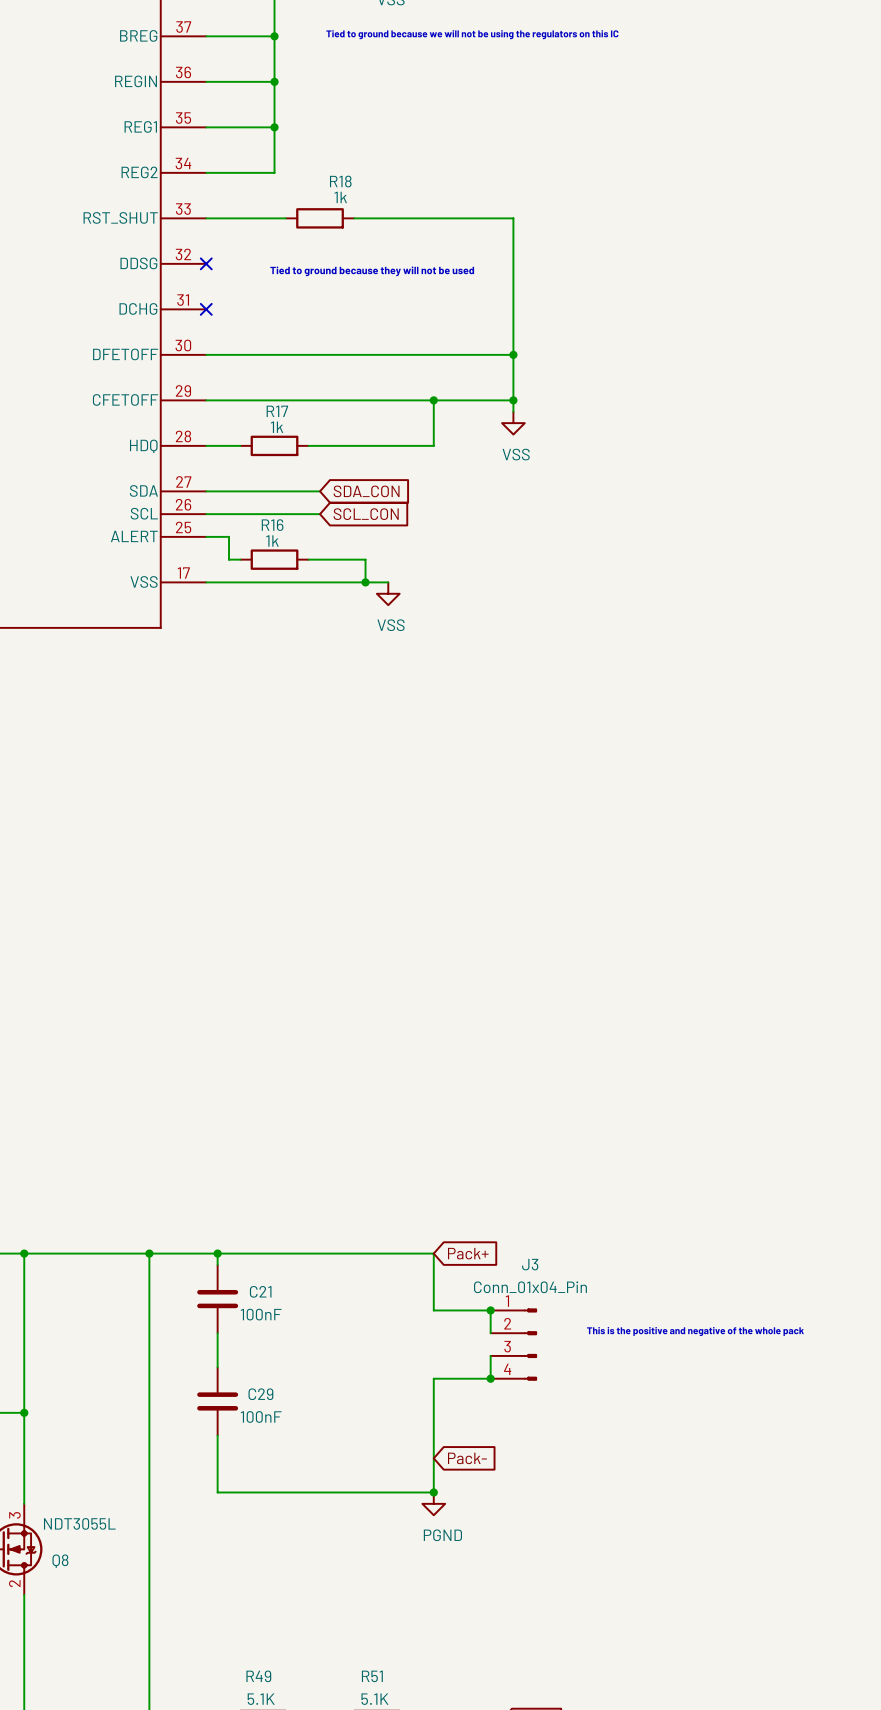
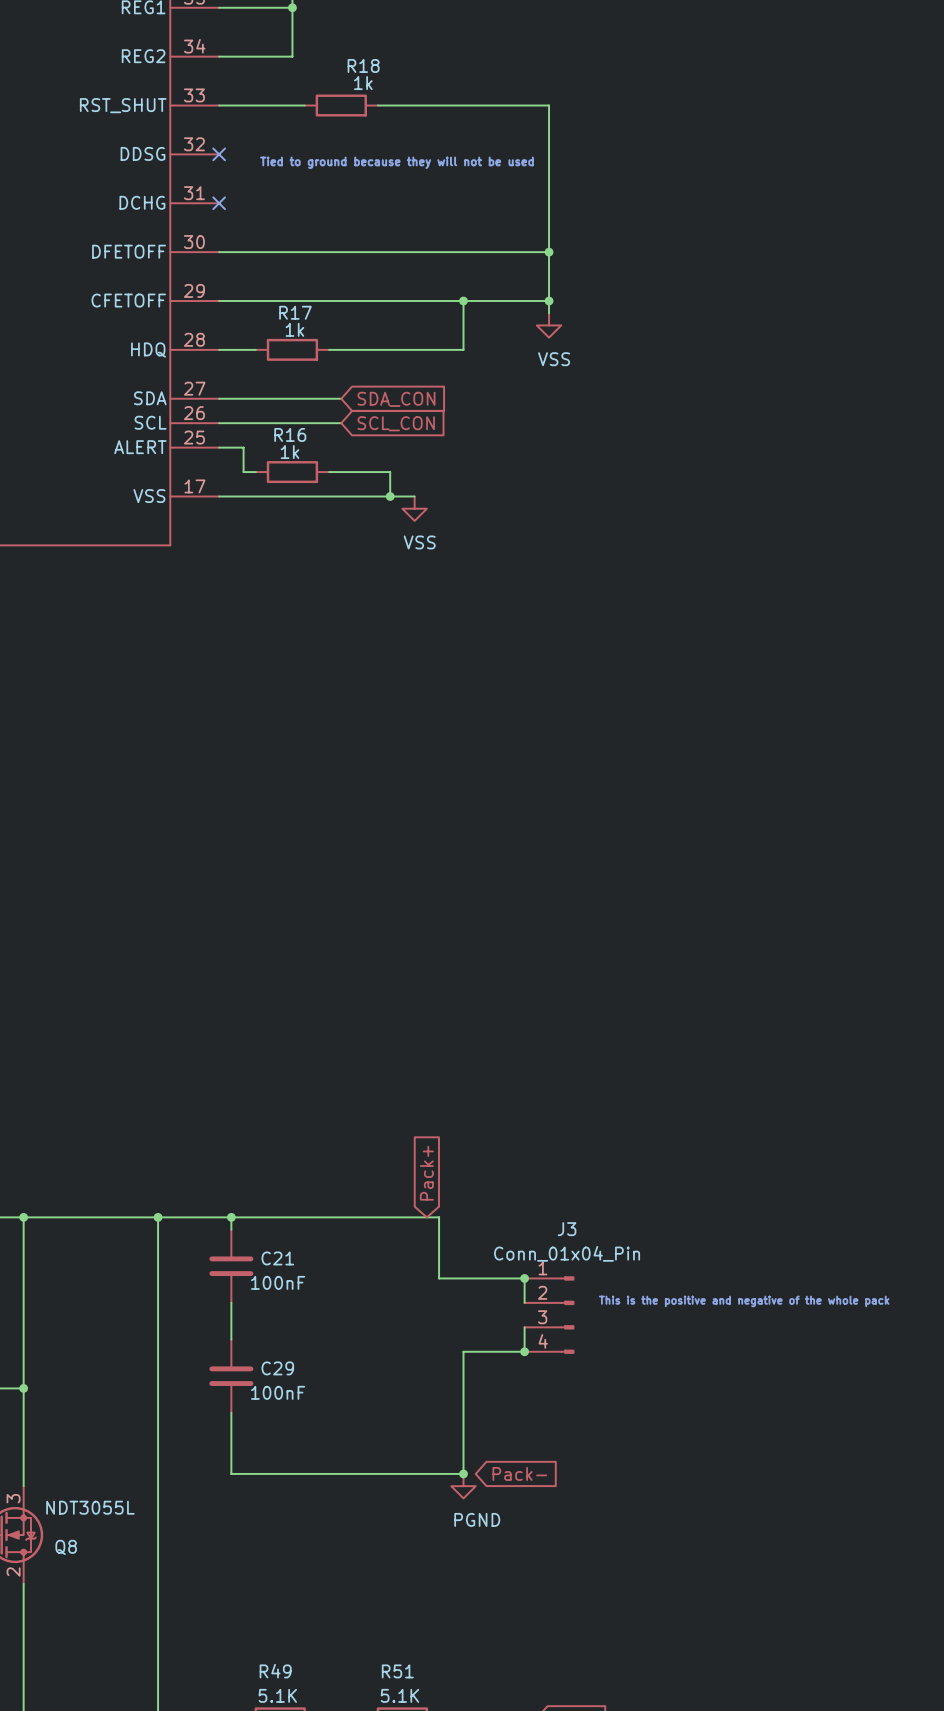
wire: (411, 1253) (433, 1253) (433, 1310) -> (439, 1217) (439, 1278) (463, 1278)
global label rotation: 0° (468, 1253) -> 90° counterclockwise (426, 1173)
global label position: Pack+ (468, 1253) -> Pack+ (426, 1173)
global label position: Pack- (467, 1458) -> Pack- (519, 1473)

